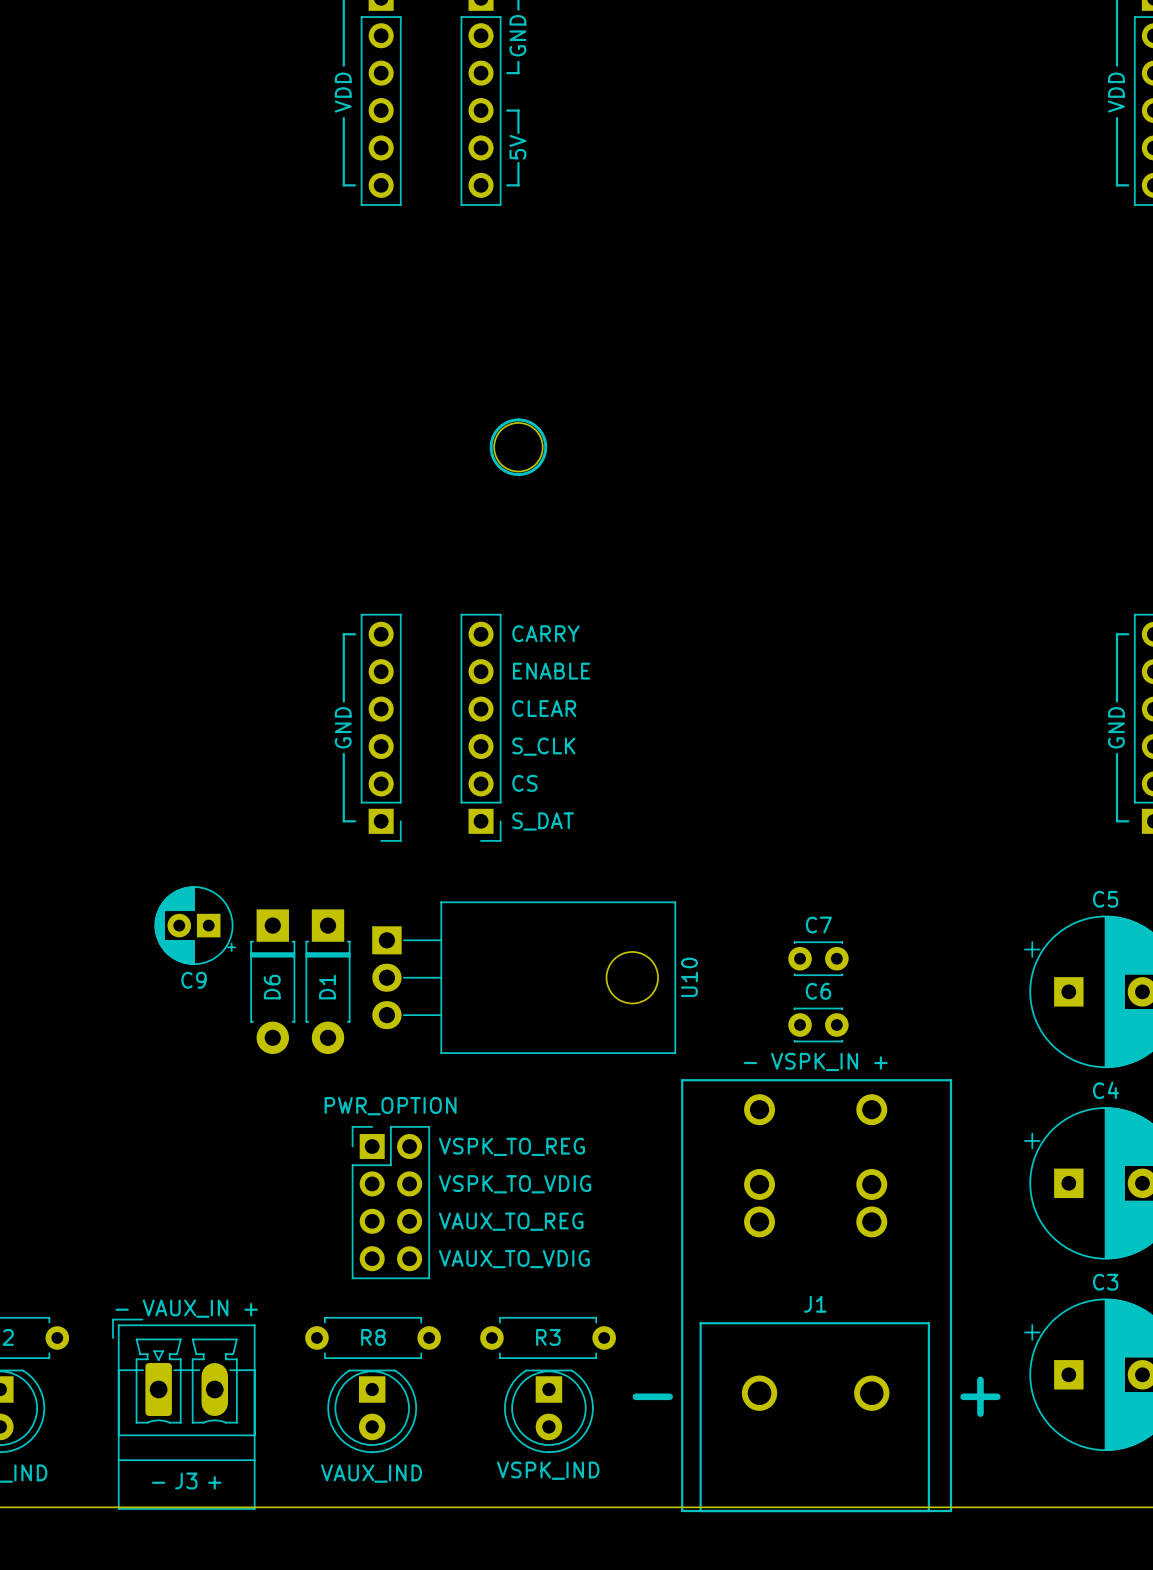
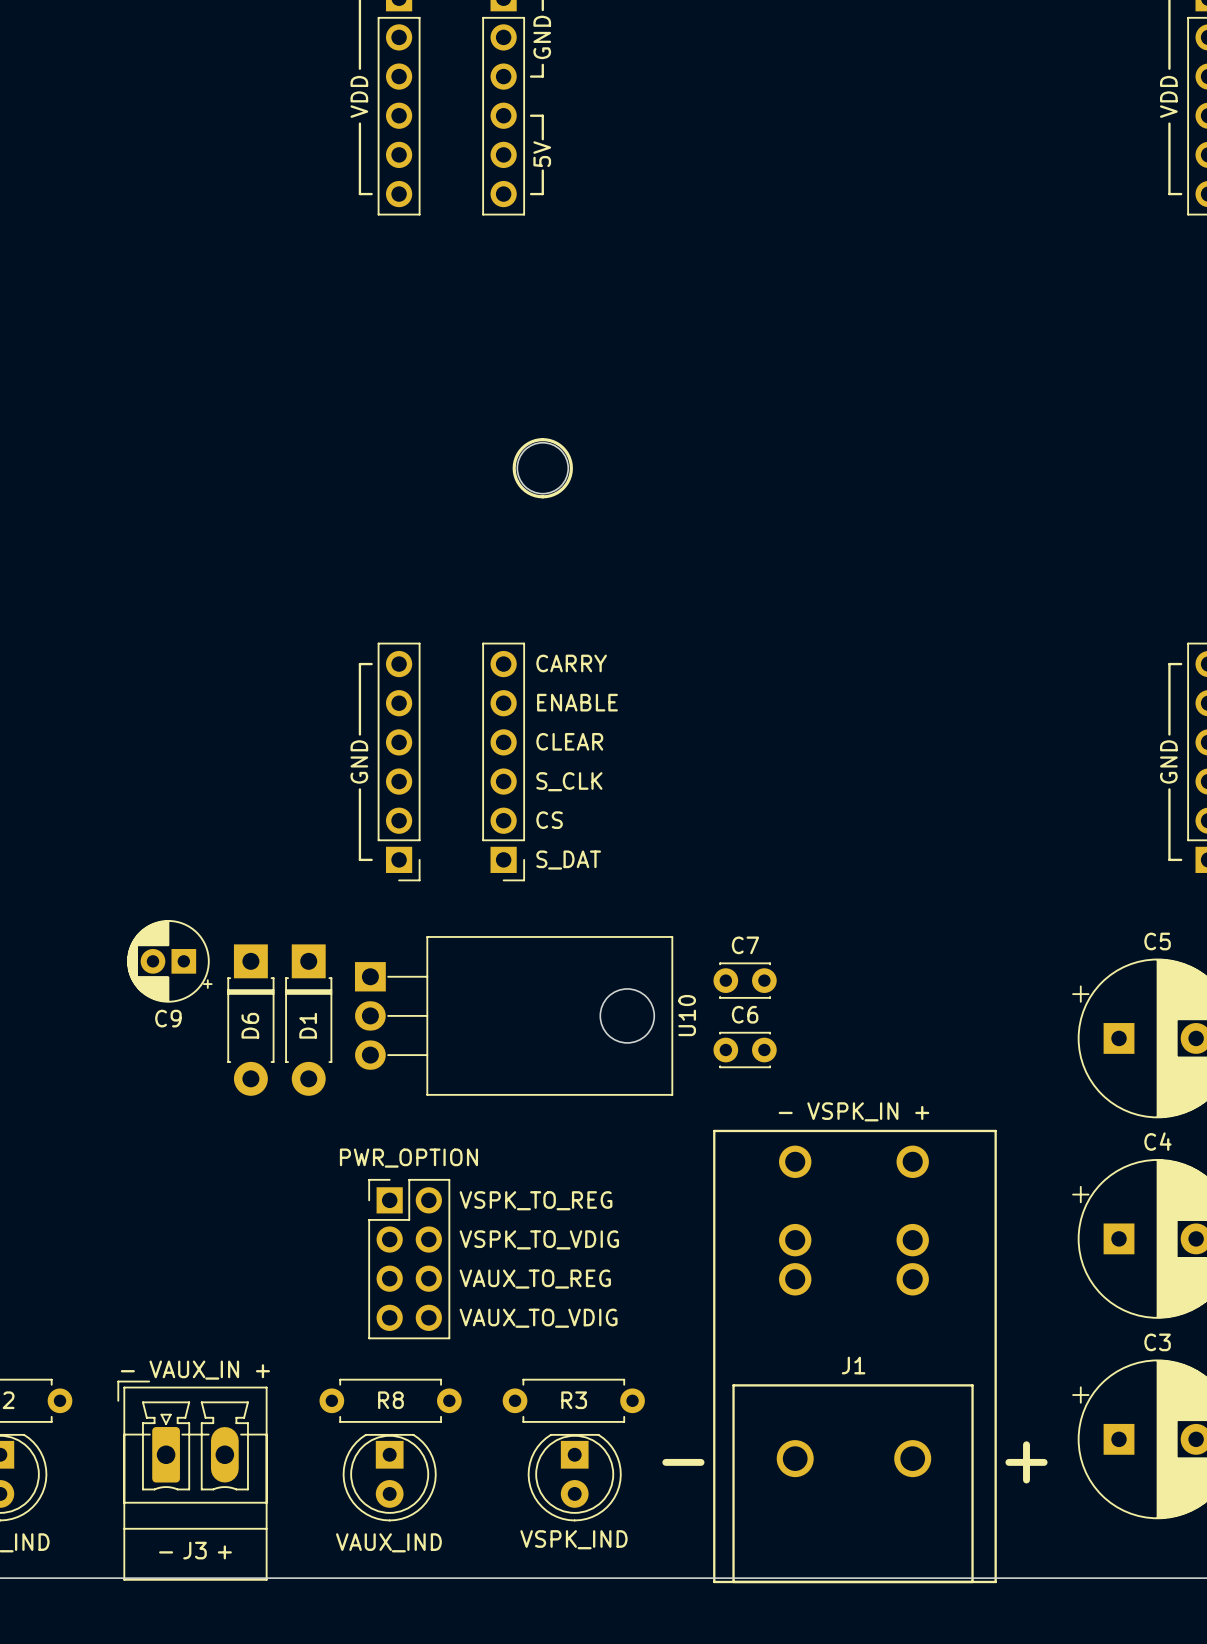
C9 position: (195, 925) -> (169, 961)
C7 position: (818, 958) -> (745, 980)
U10 position: (524, 977) -> (514, 1015)
D6 position: (272, 981) -> (250, 1020)
D1 position: (328, 981) -> (308, 1020)
C6 position: (818, 1025) -> (745, 1050)

